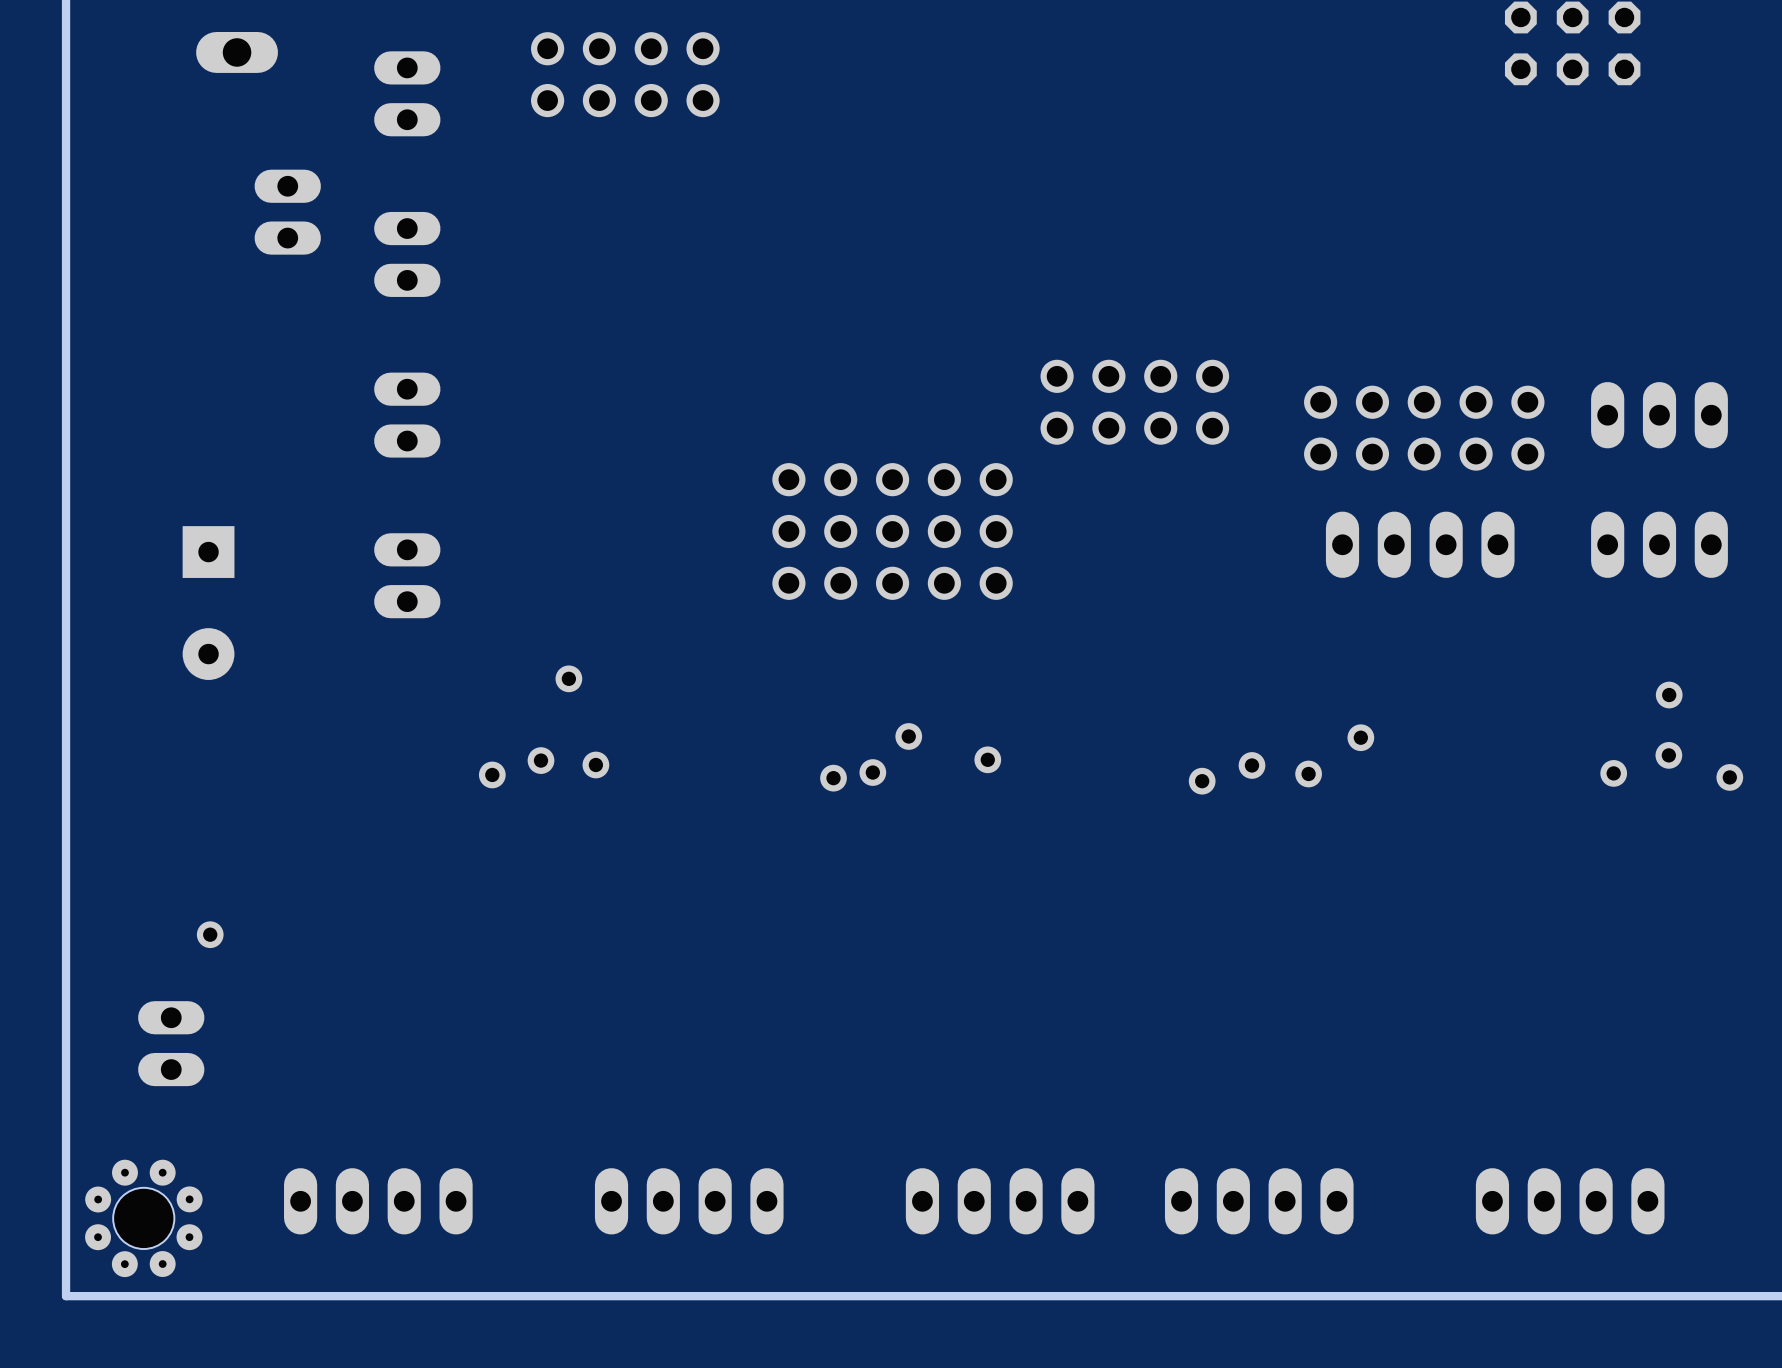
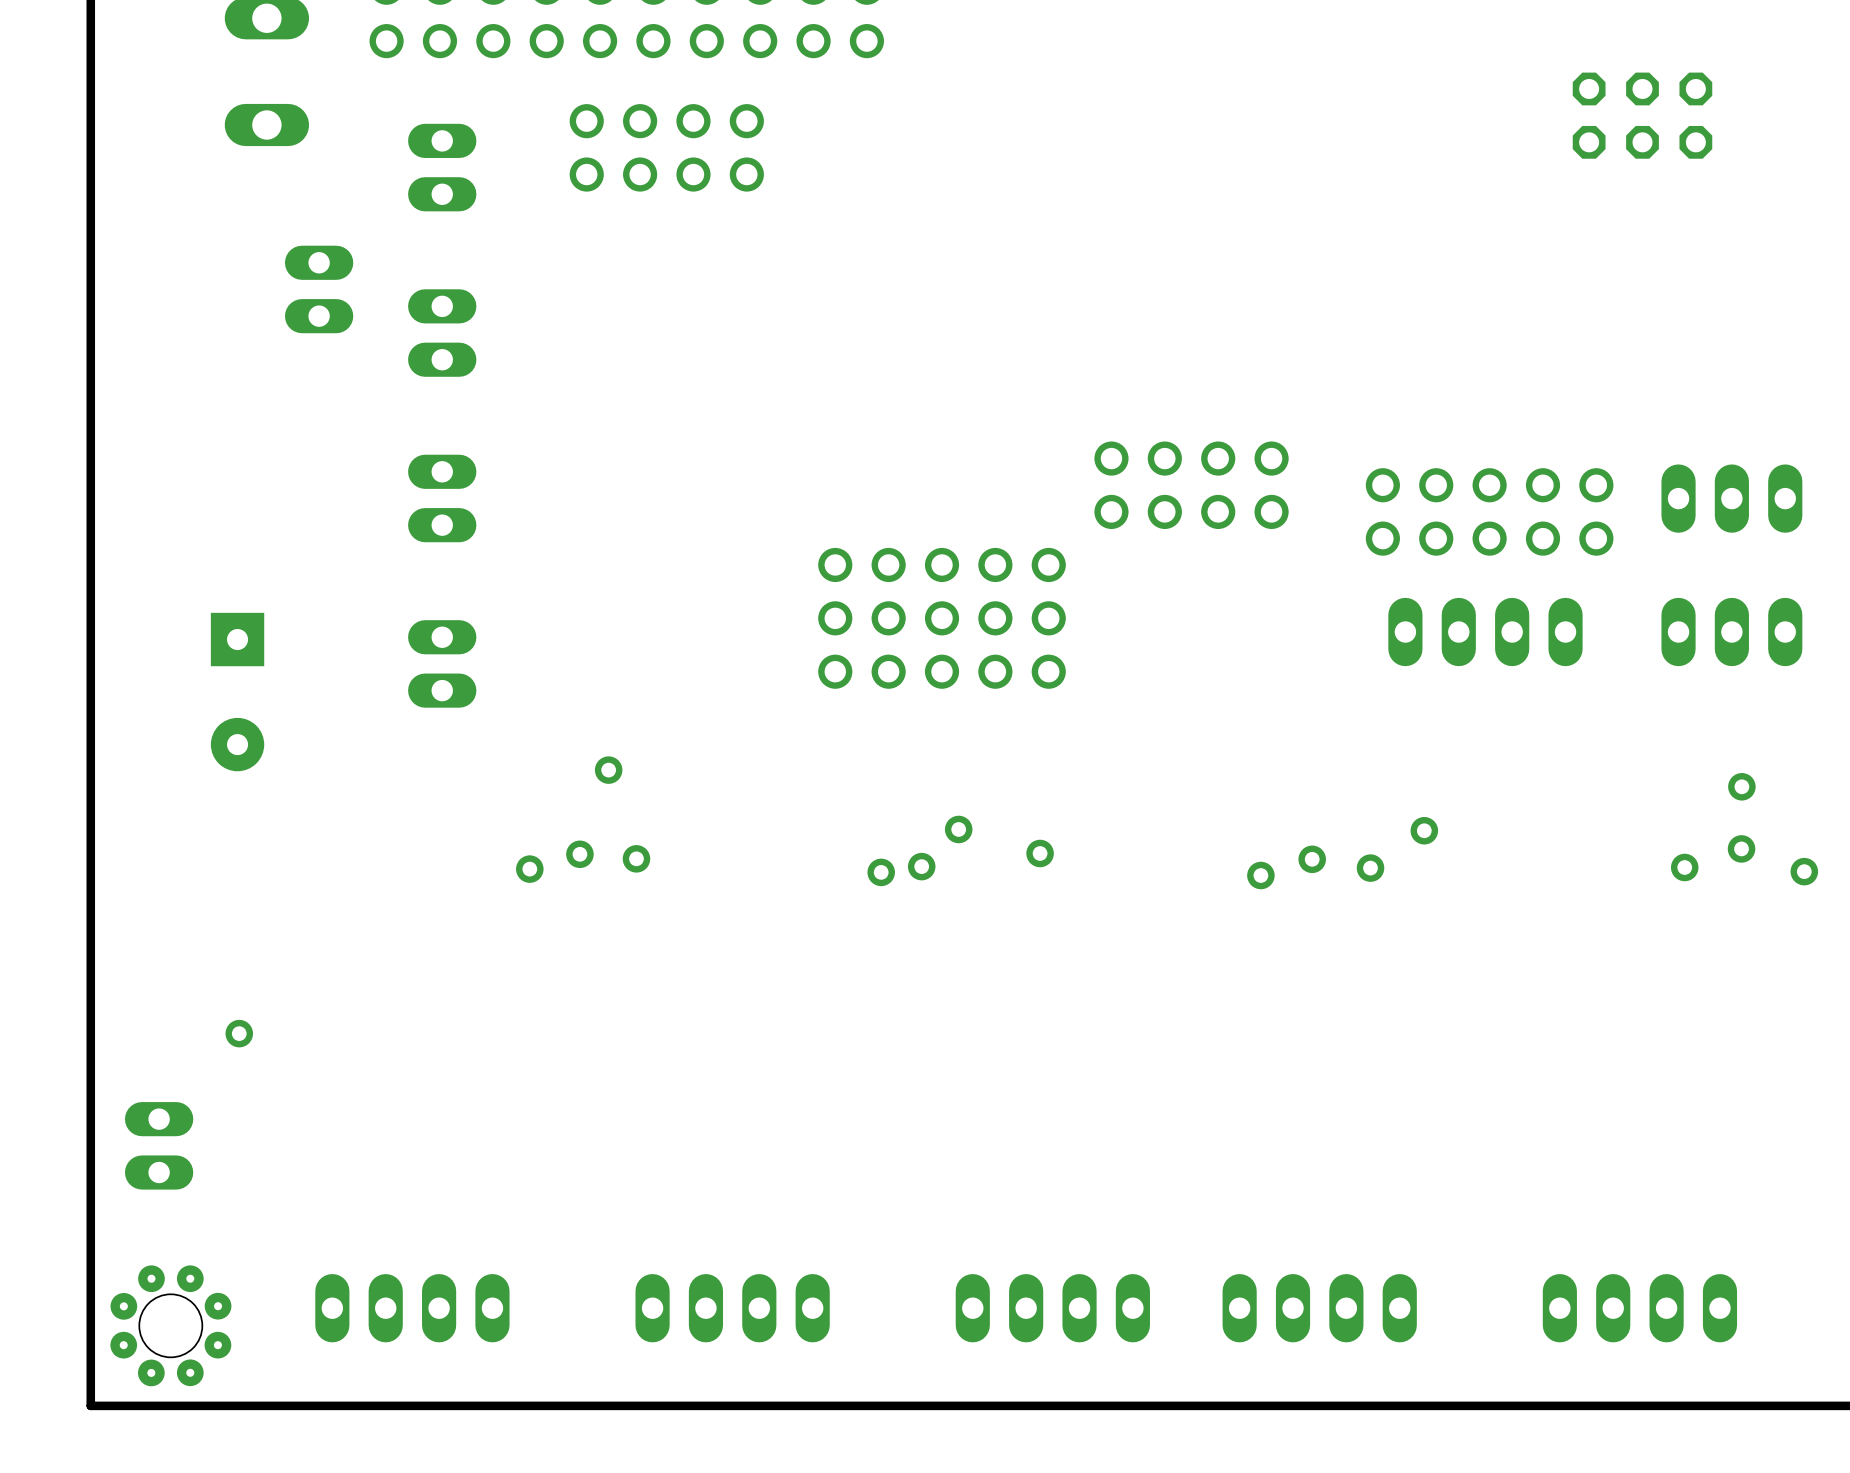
part position: (171, 1043) -> (159, 1145)

